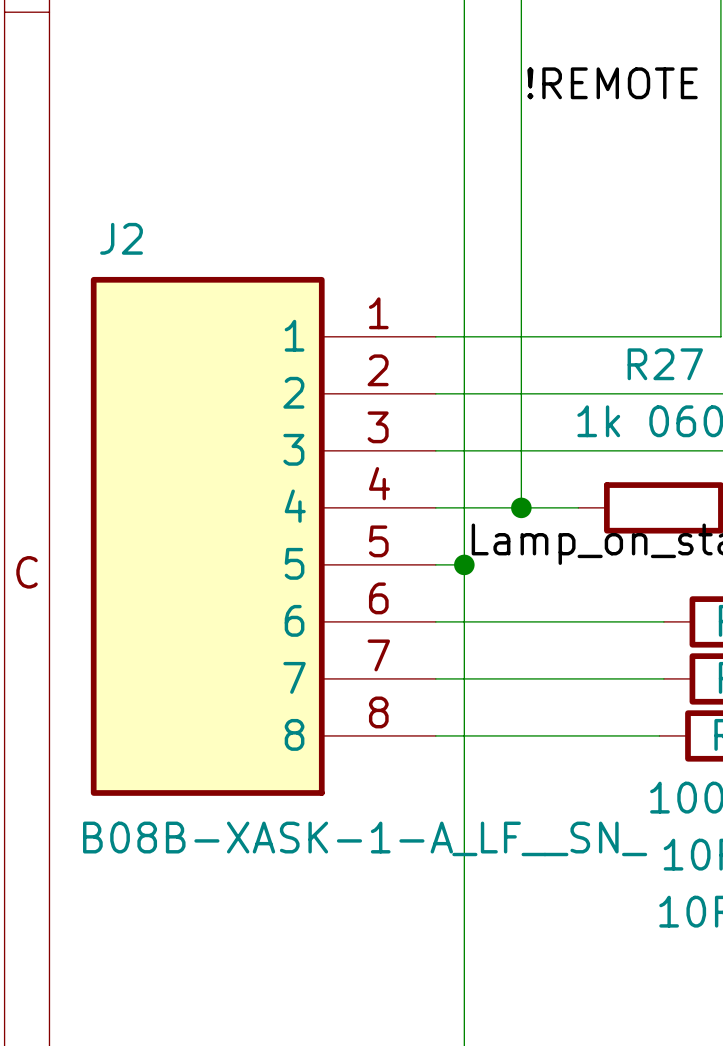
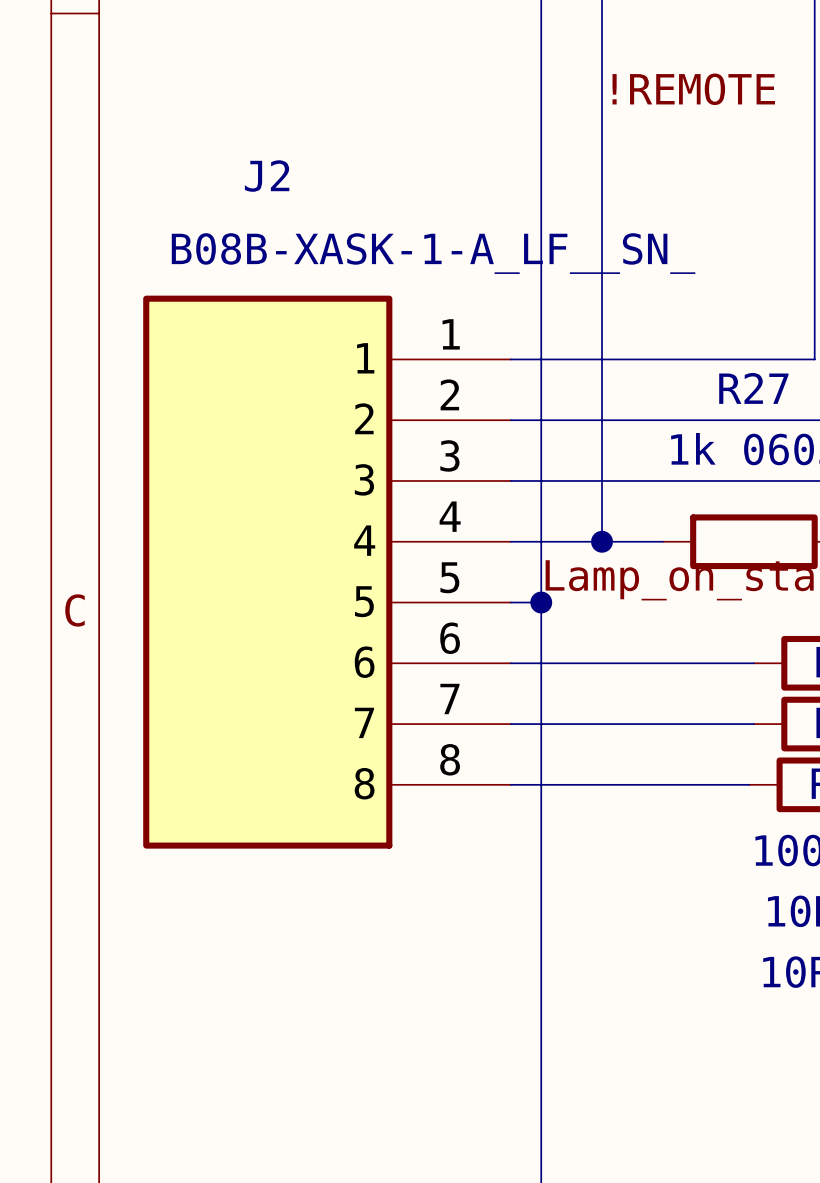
J2 name position: J2 (121, 238) -> J2 (267, 176)
J2 value position: B08B-XASK-1-A_LF__SN_ (365, 838) -> B08B-XASK-1-A_LF__SN_ (433, 253)

